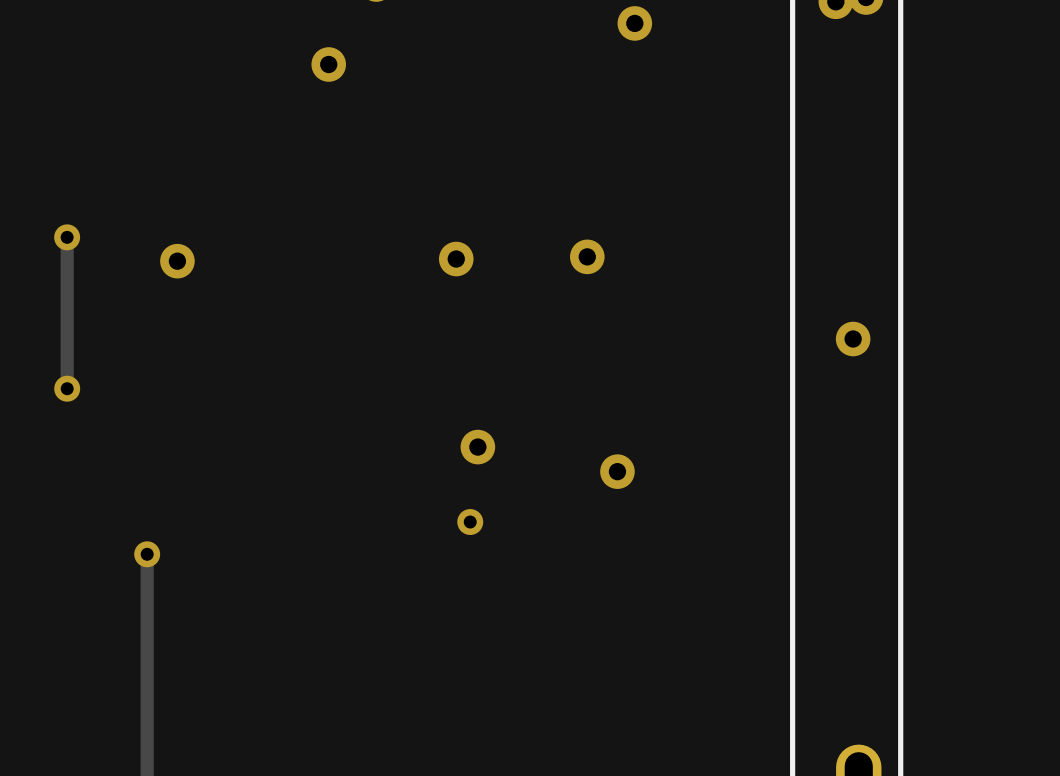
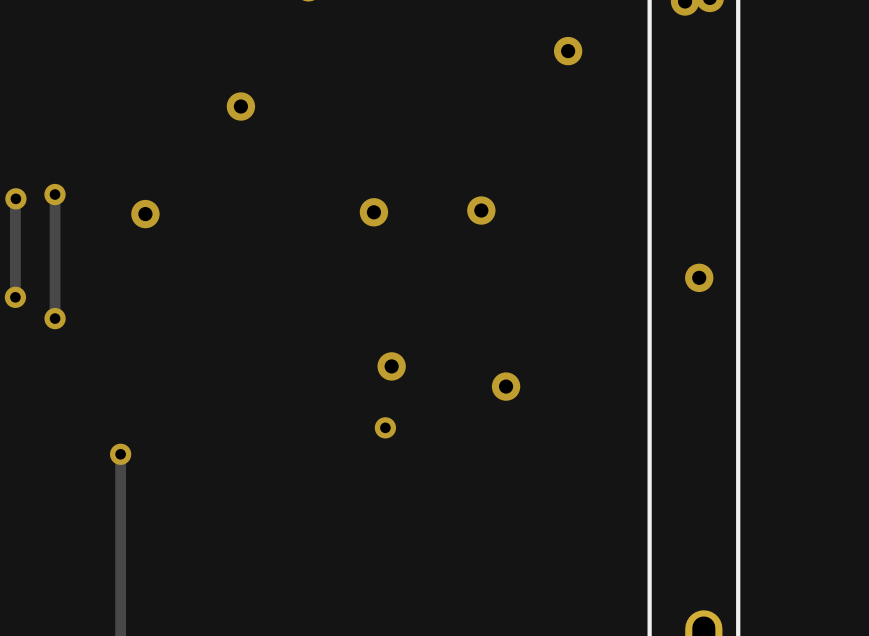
via: (634, 23) -> none
via: none -> (568, 51)
via position: (328, 64) -> (240, 106)
via: none -> (15, 198)
track: none -> (15, 199) (15, 297)
via: none -> (15, 297)

